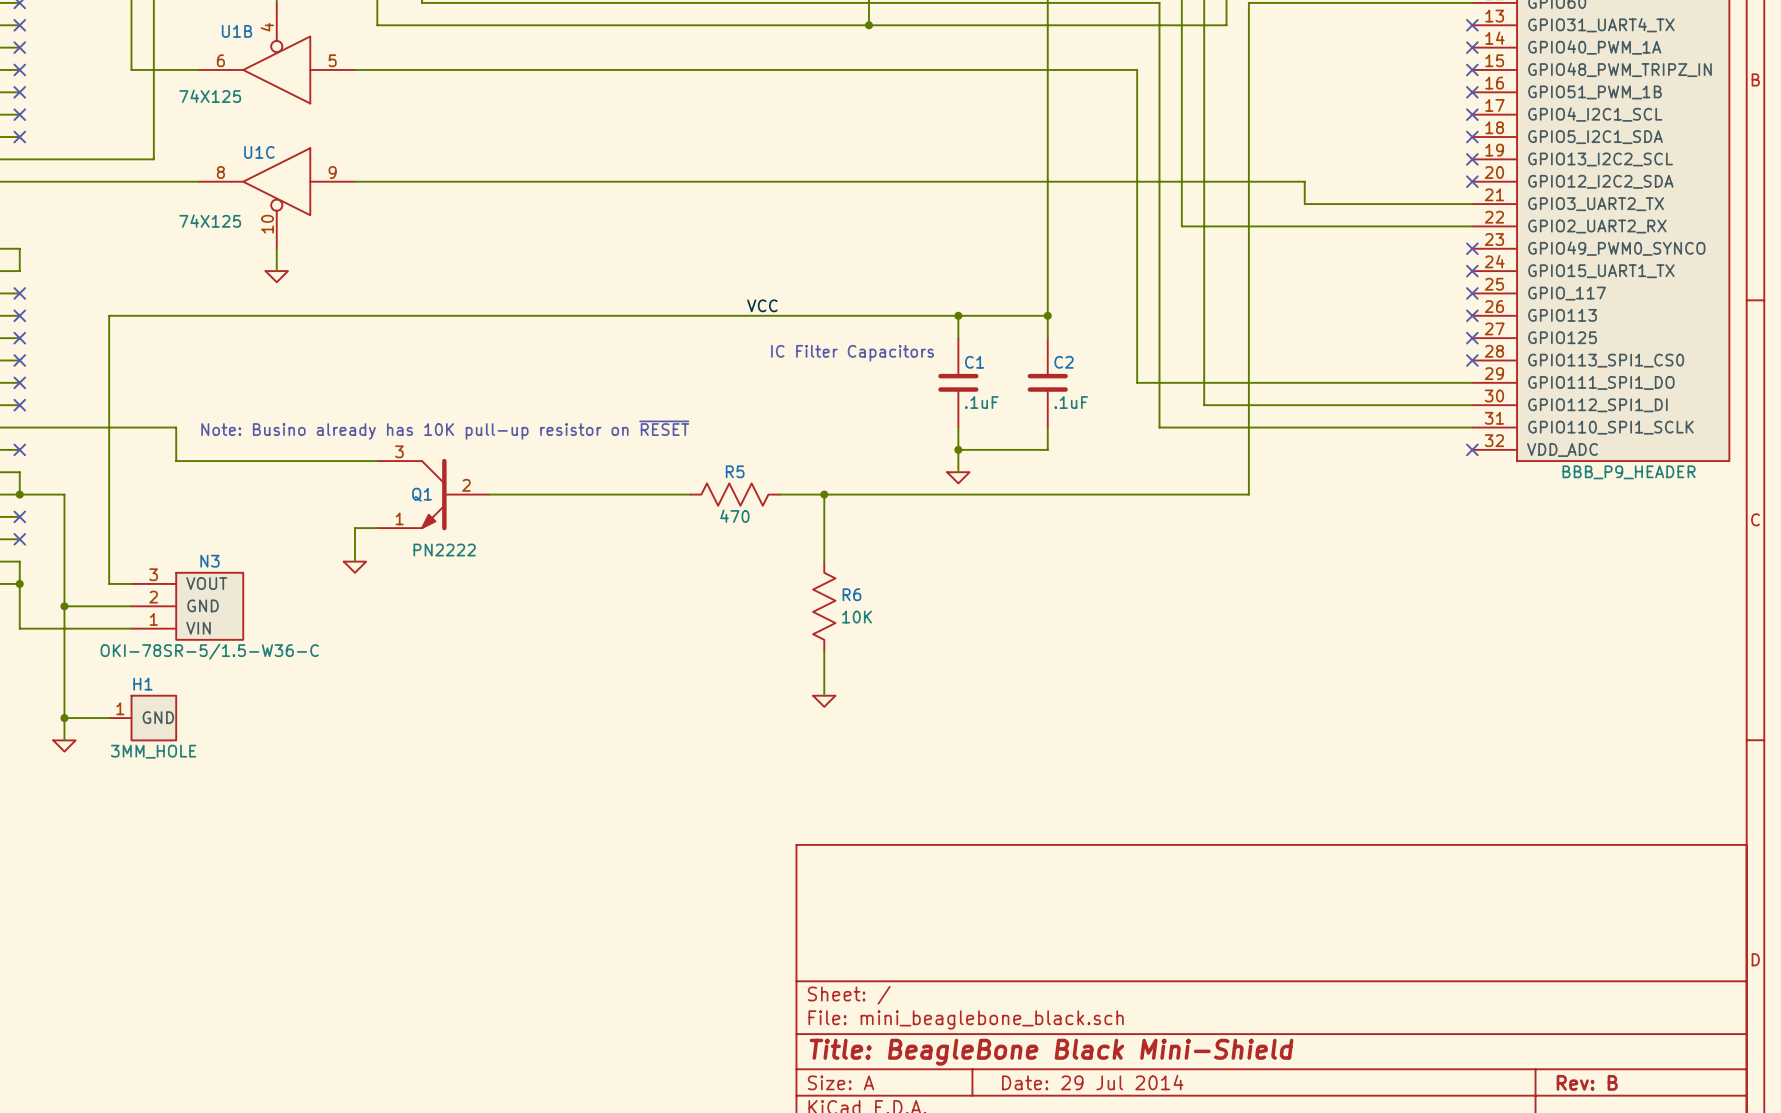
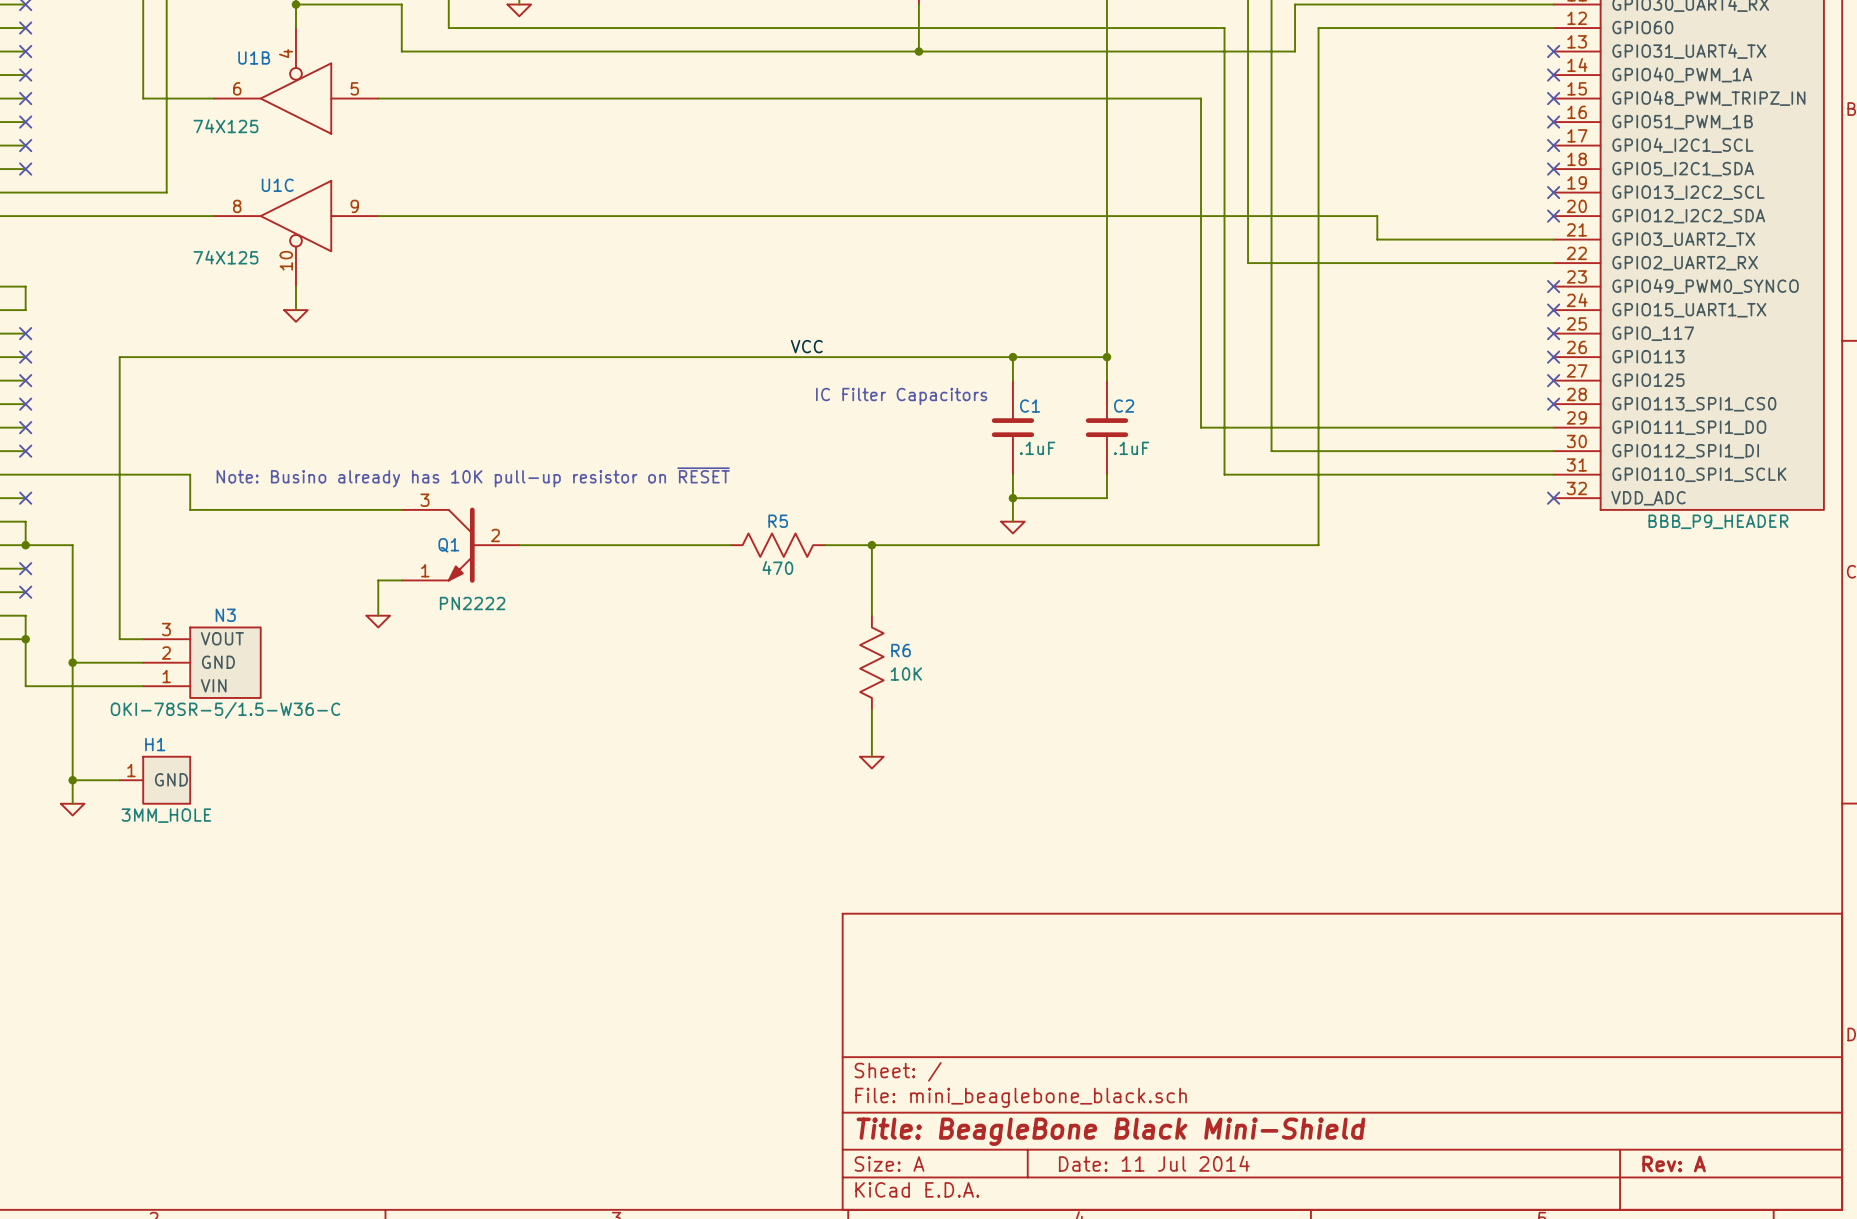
title block: Date: 29 Jul 2014 (1092, 1082) -> Date: 11 Jul 2014 (1154, 1163)
title block: Rev: B (1587, 1082) -> Rev: A (1674, 1163)

